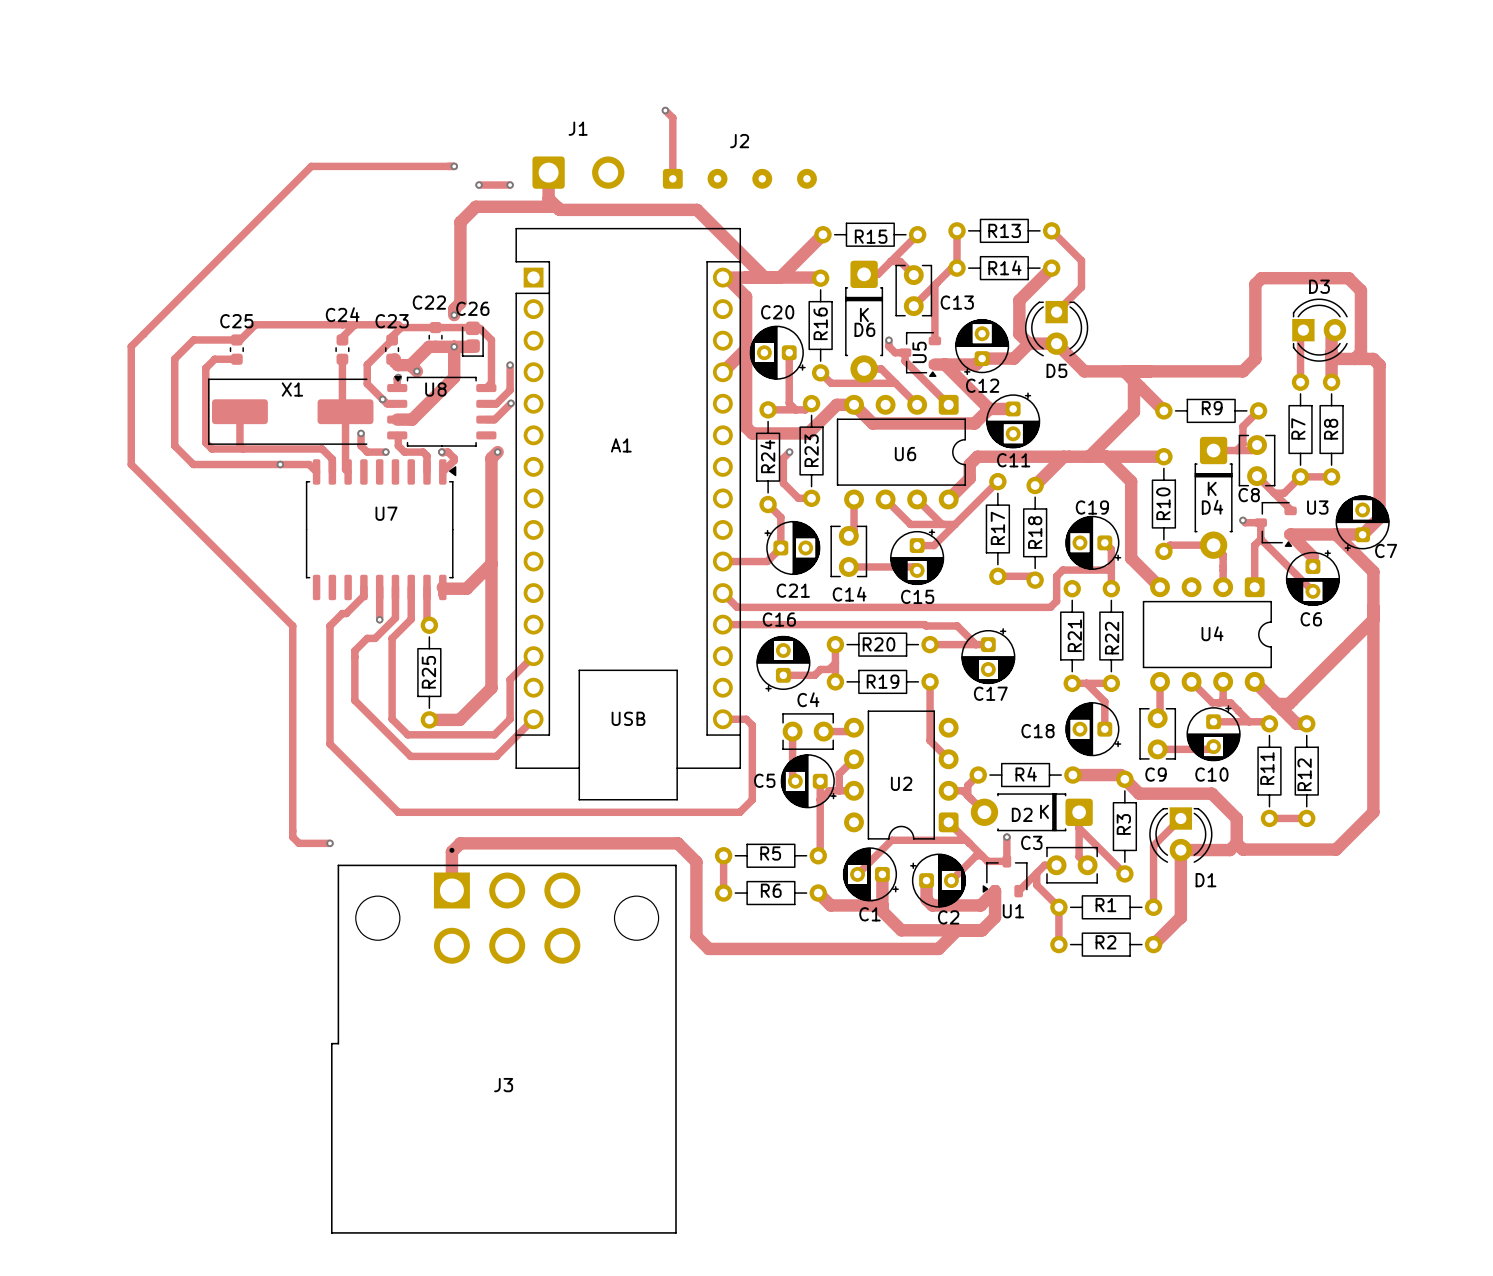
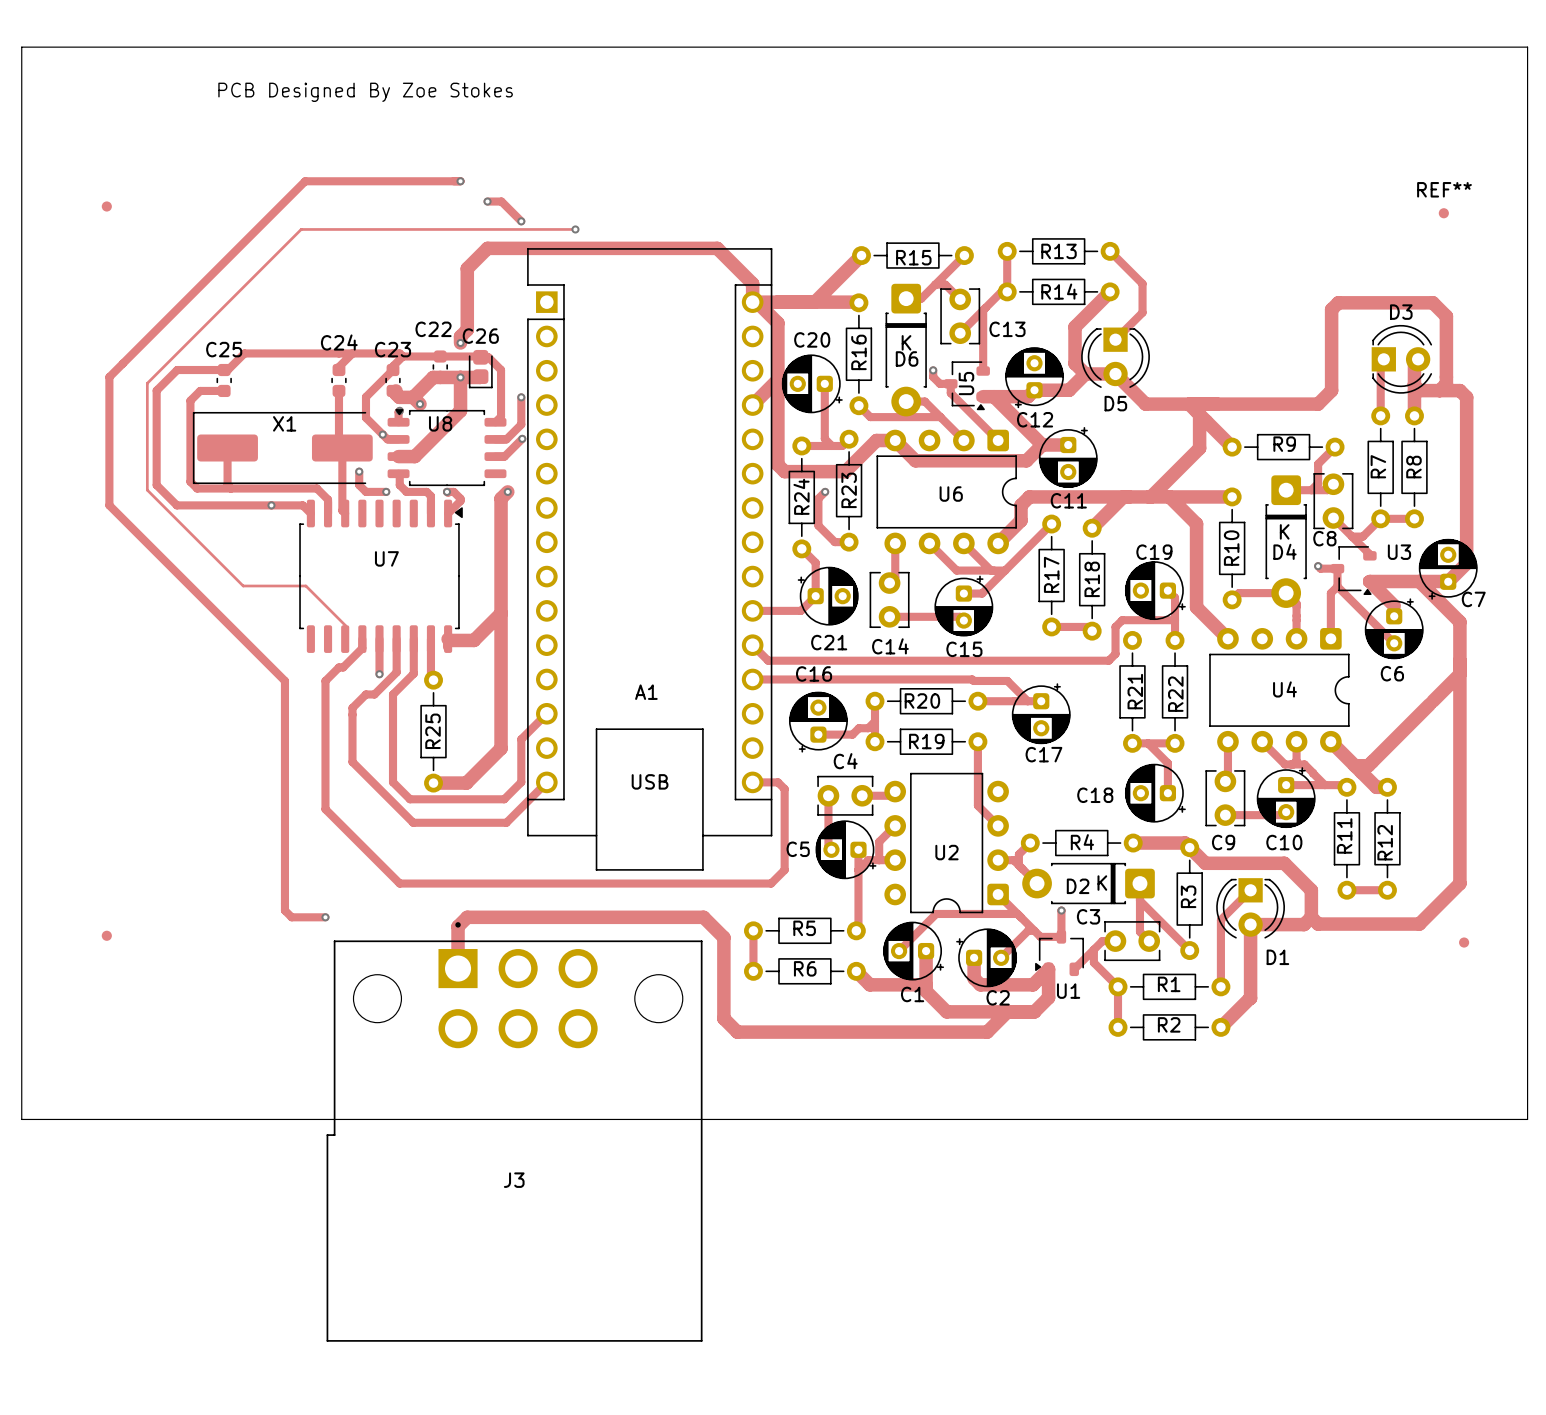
board edge: none -> (21, 47) (1527, 47) (1527, 1119) (21, 1119) (21, 47)
text: none -> PCB Designed By Zoe Stokes (365, 92)
track: (665, 110) (672, 117) (672, 178) -> none
via: (665, 110) -> none
track: (548, 172) (548, 198) (559, 209) (697, 209) (764, 277) -> none
J1: (578, 172) -> none
J2: (739, 178) -> none
track: (491, 185) (510, 185) -> (501, 201) (521, 221)
via position: (510, 185) -> (521, 221)
part: none -> (106, 206)
REF**: none -> (1443, 213)
track: (556, 206) (475, 206) (460, 222) (460, 246) -> (752, 302) (752, 283) (717, 248) (487, 248) (467, 268)
track: none -> (575, 229) (301, 229) (147, 383) (147, 490) (243, 585) (305, 585) (345, 625) (345, 639)
via: none -> (575, 229)
A1 name position: A1 (621, 445) -> A1 (646, 692)
part: none -> (106, 935)
part: none -> (1464, 942)

